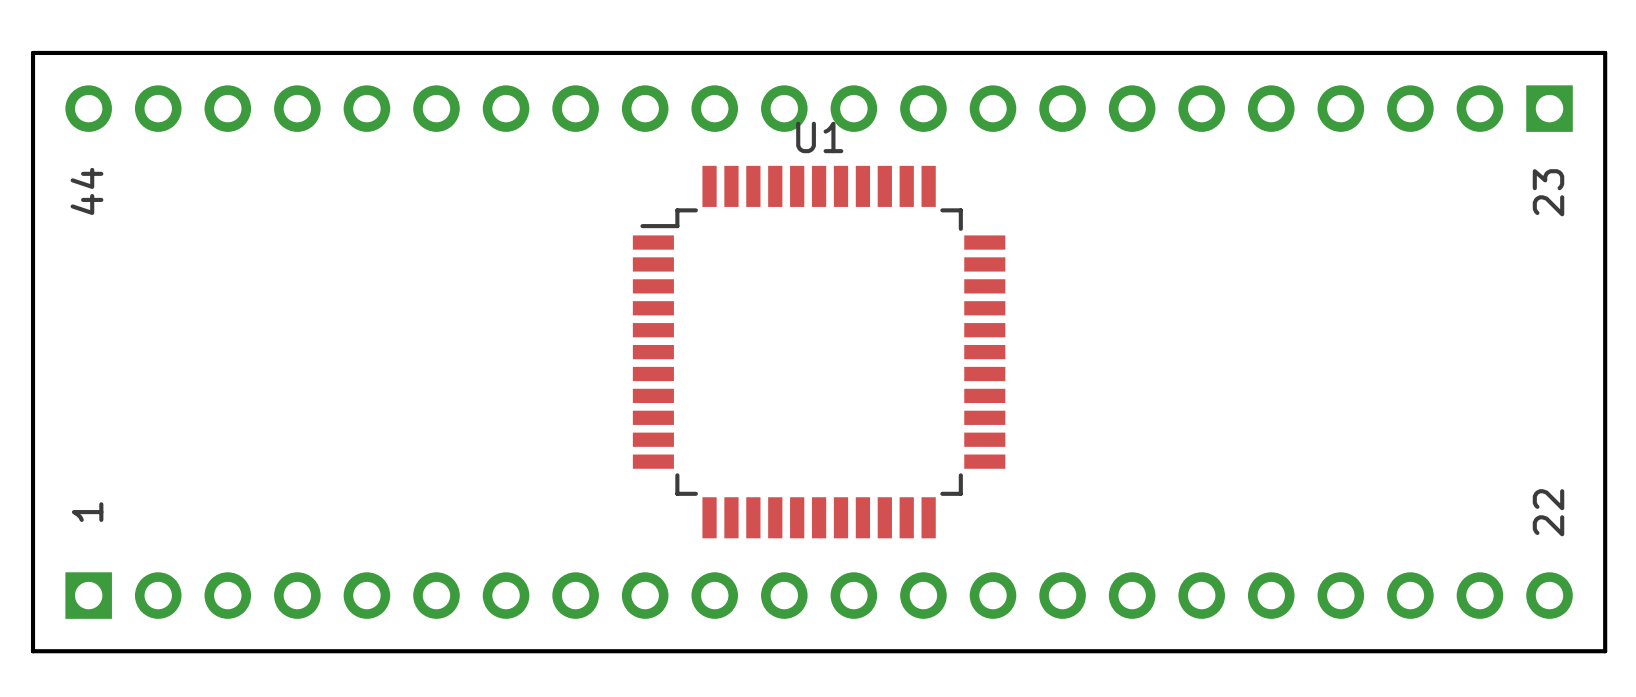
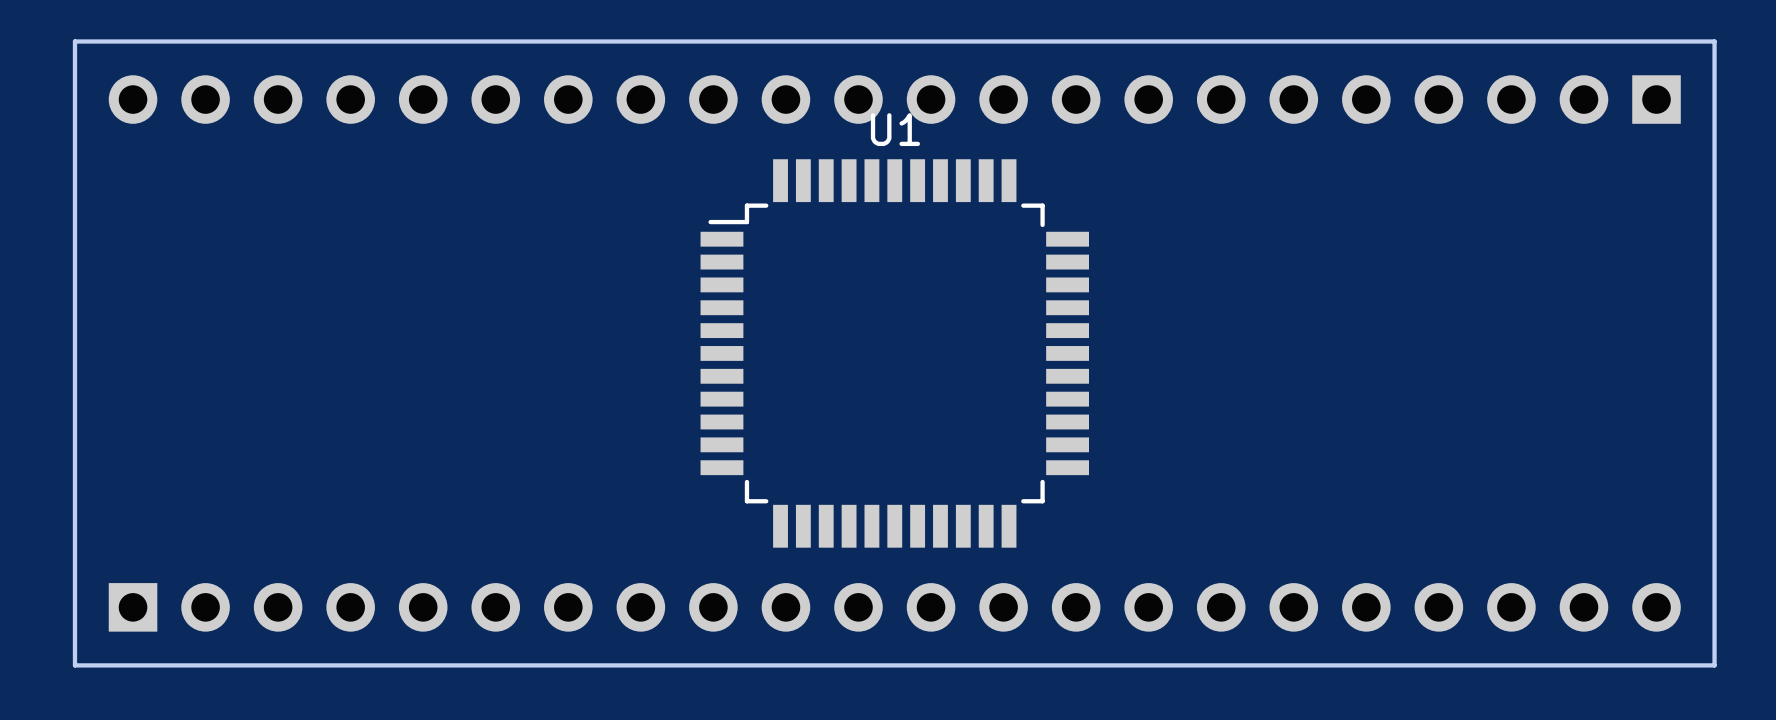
text: 44 (86, 191) -> none
text: 23 (1548, 192) -> none
text: 1 (87, 512) -> none
text: 22 (1548, 512) -> none

